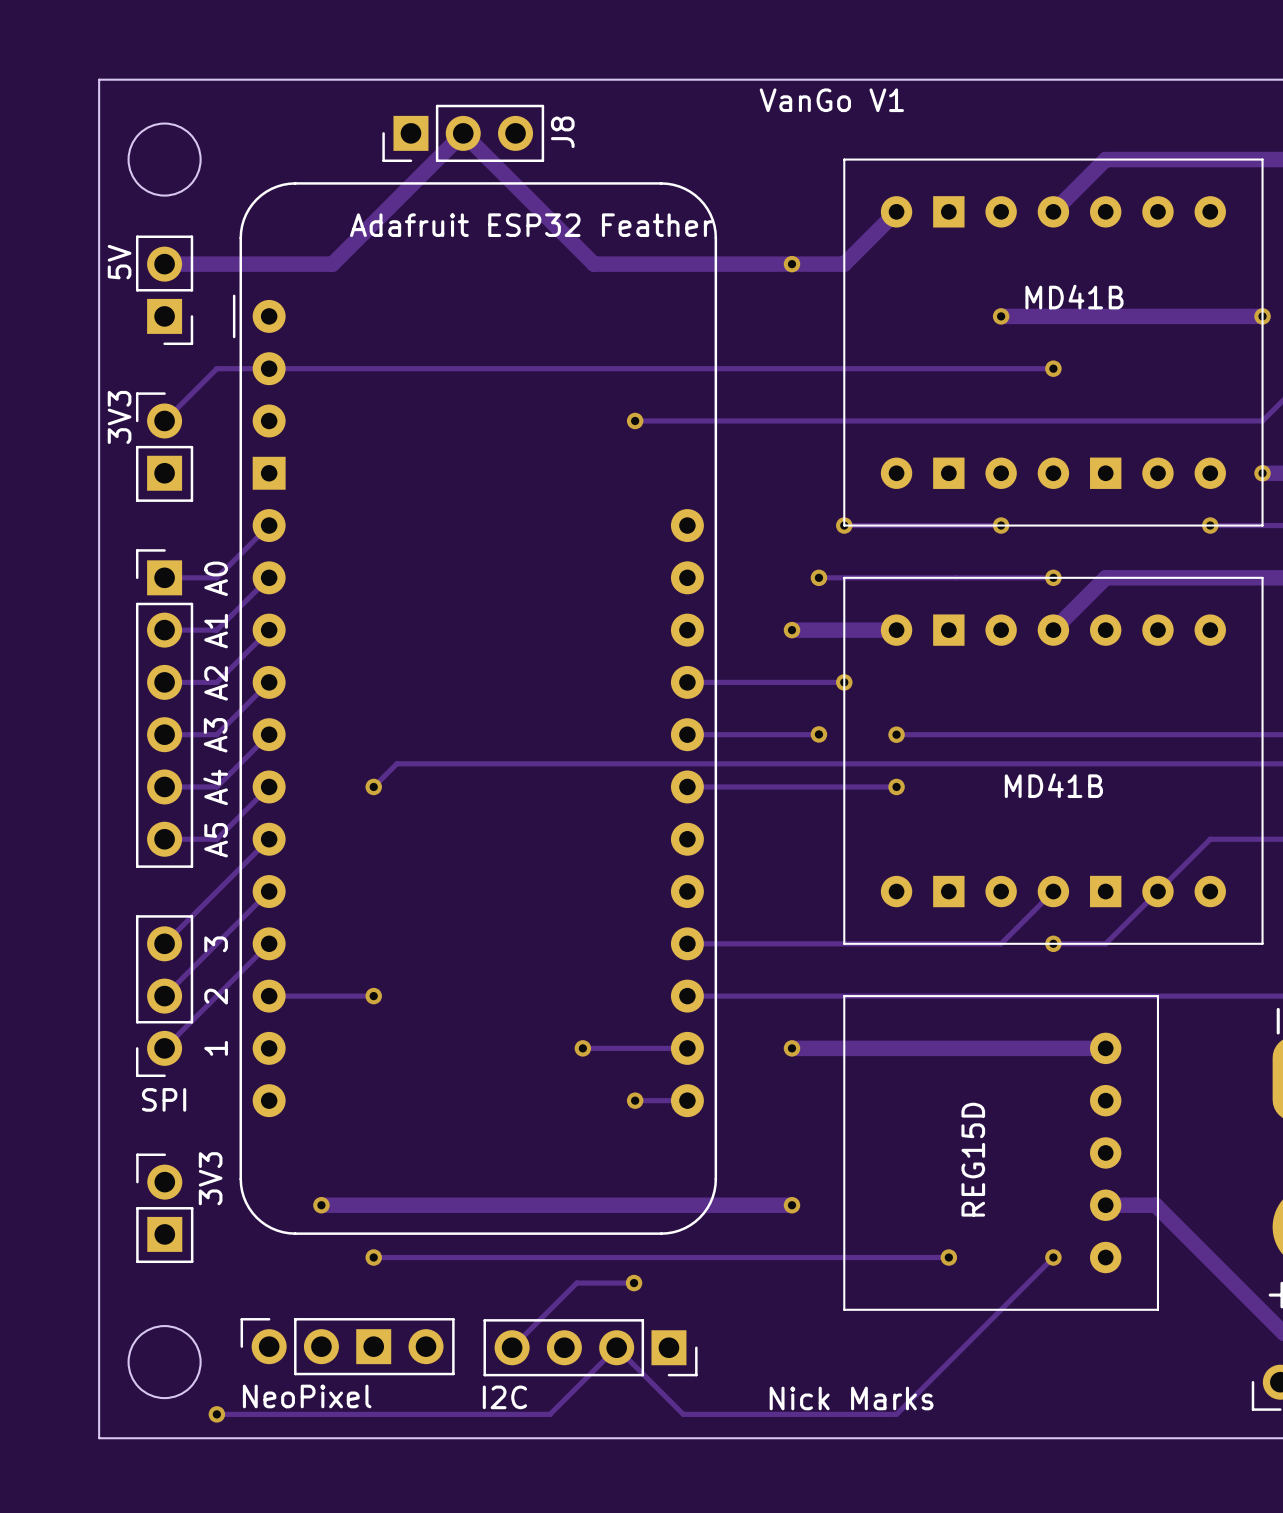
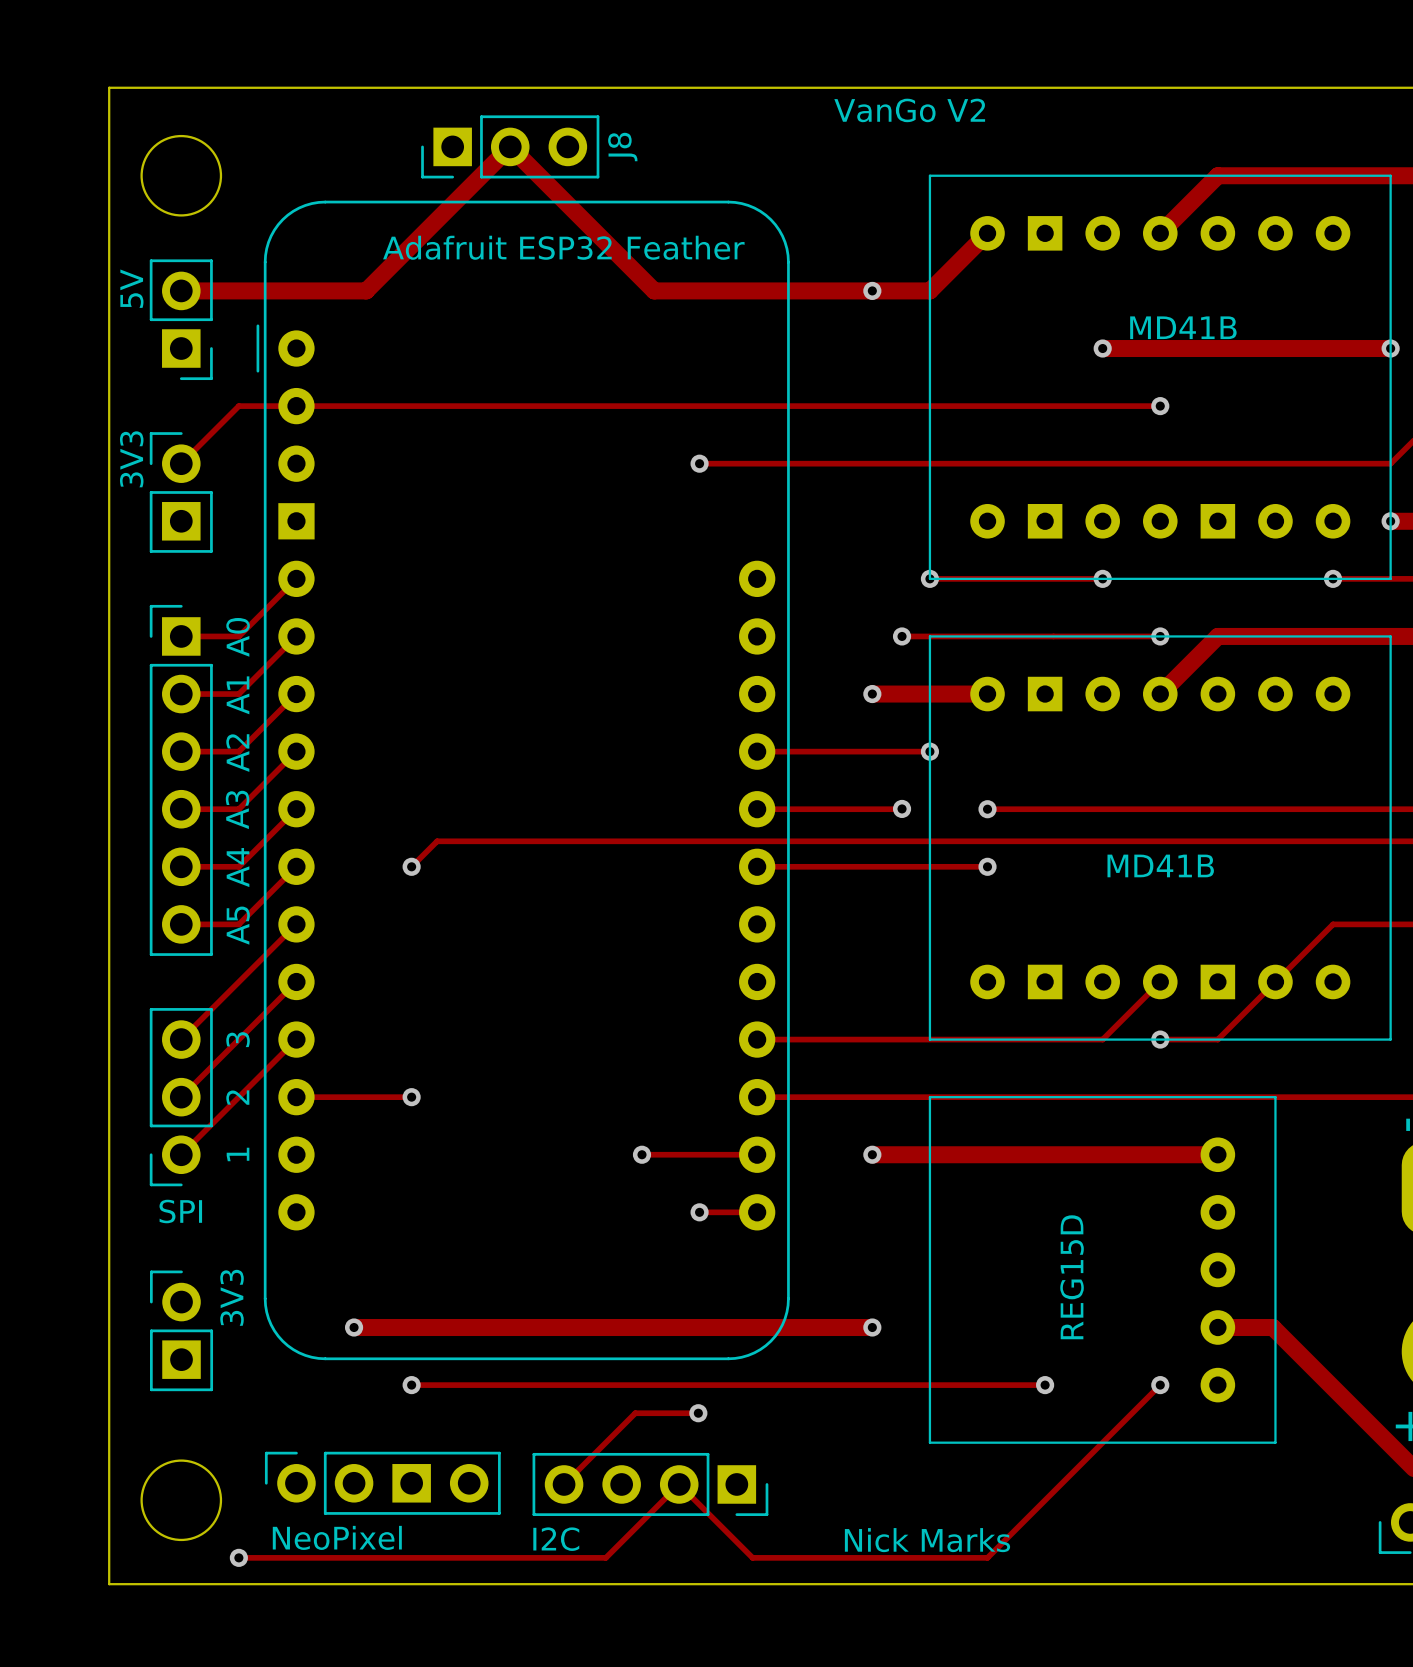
text: VanGo V1 (831, 100) -> VanGo V2 (909, 110)

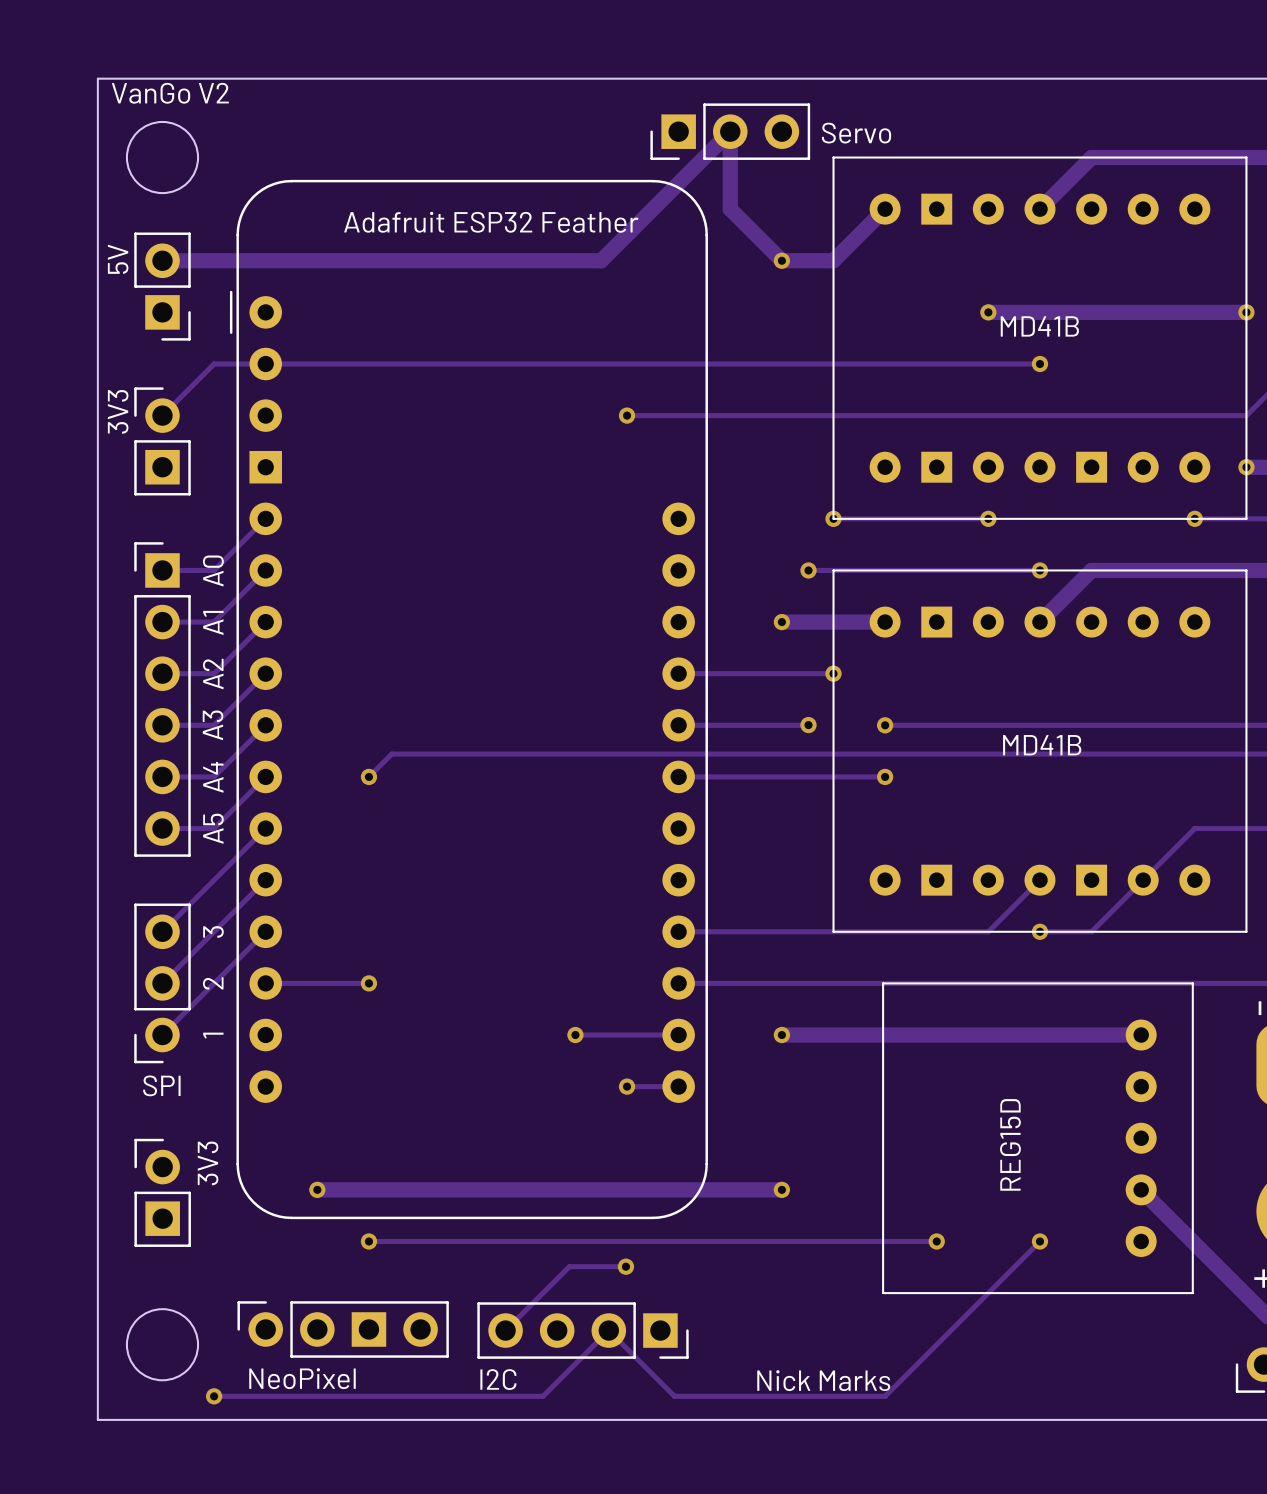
text: none -> VanGo V2 (170, 93)
text: VanGo V2 (909, 110) -> none
J8: (510, 146) -> none
Servo: none -> (730, 131)
track: (366, 290) (510, 146) (654, 290) -> (328, 260) (586, 260)
track: (670, 290) (872, 290) -> (601, 260) (730, 131) (730, 209) (781, 260)
part value position: MD41B (1183, 327) -> MD41B (1039, 326)
part value position: MD41B (1160, 865) -> MD41B (1042, 745)
part position: (1102, 1269) -> (1037, 1138)
track: (1217, 1327) (1272, 1327) -> (1091, 1035) (1141, 1035)

